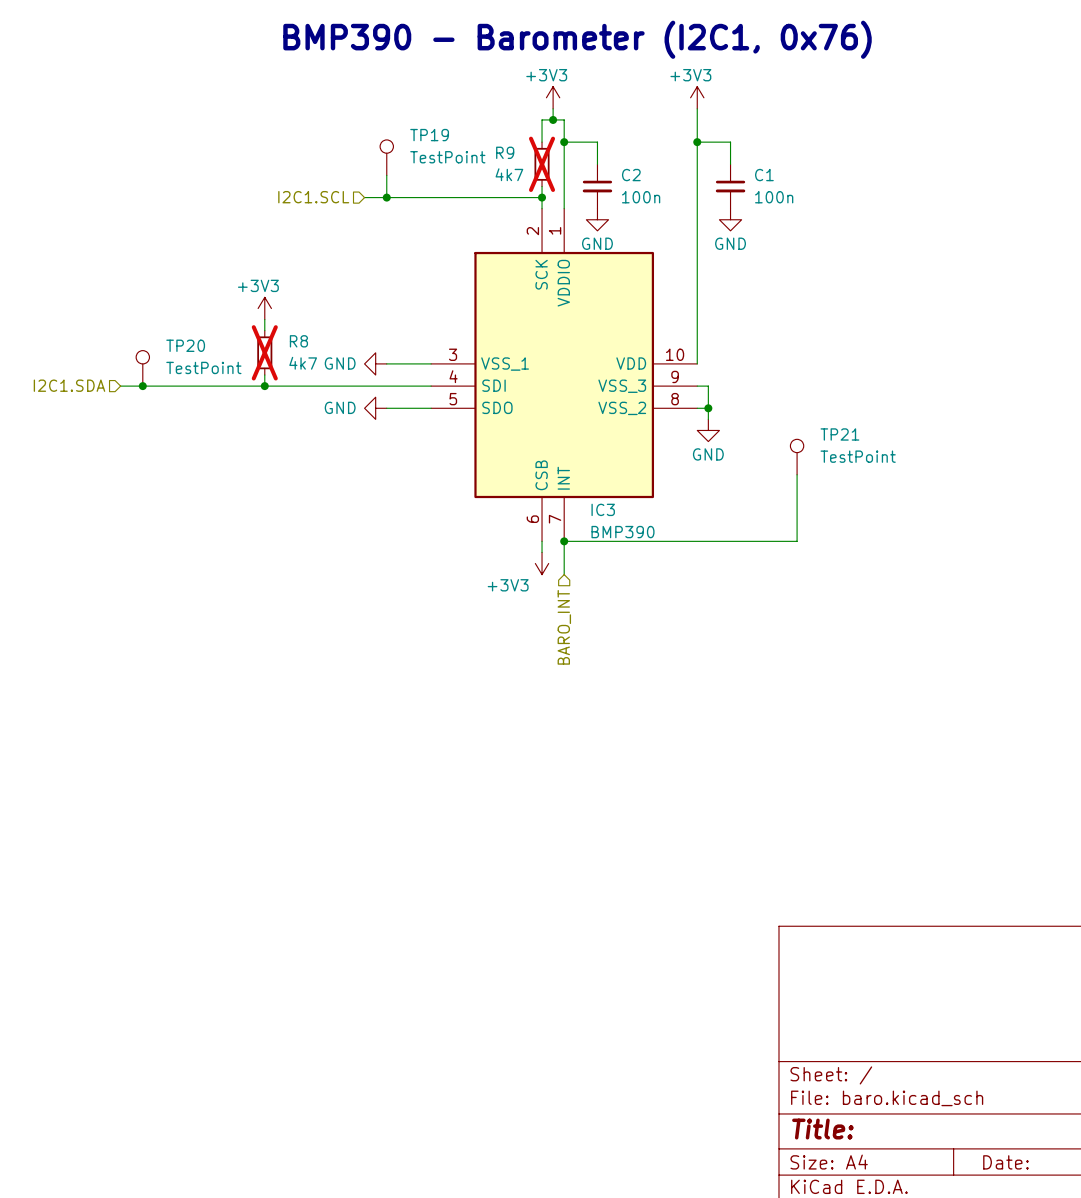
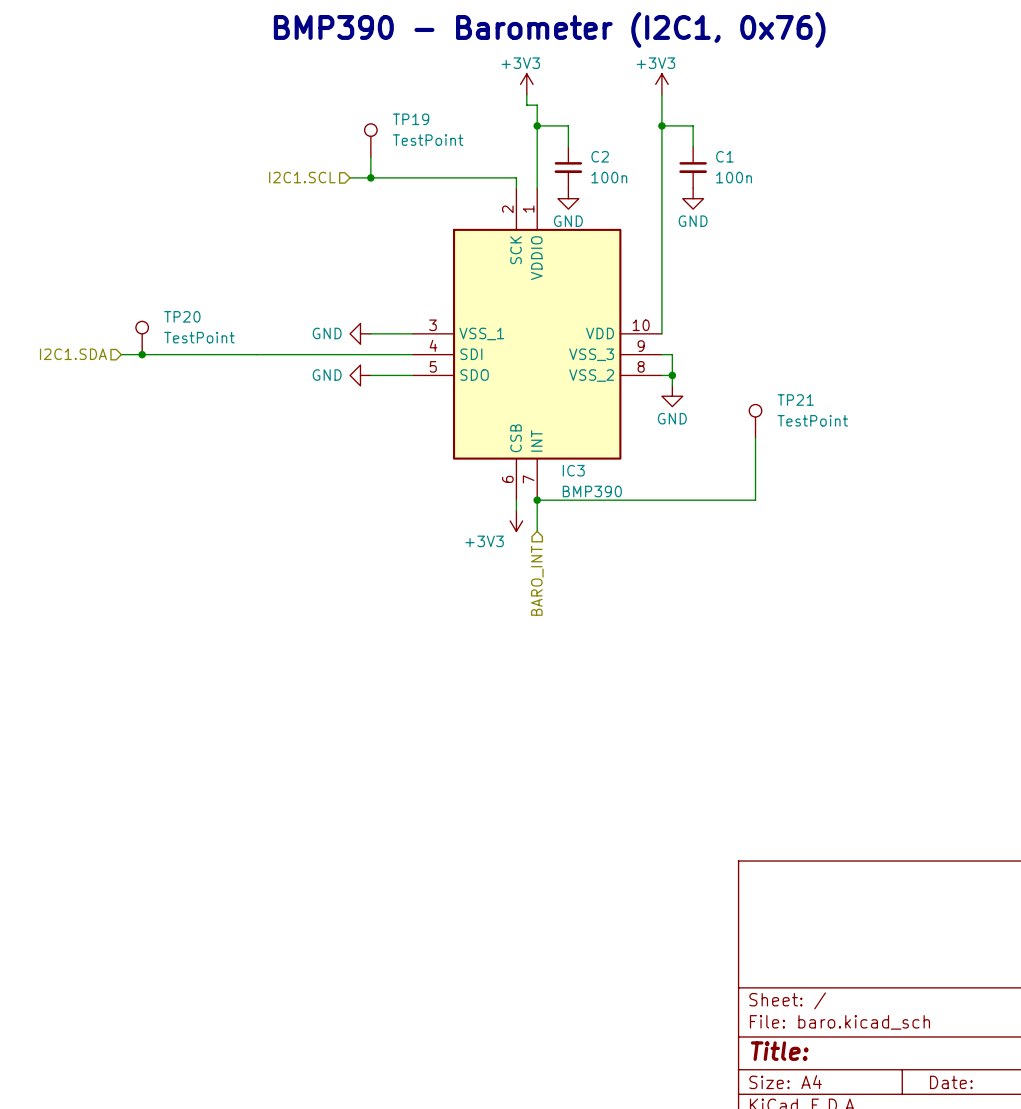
wire: (553, 119) (542, 119) (542, 142) -> none
junction: (553, 119) -> none
R9: 4k7 (542, 164) -> none
wire: (542, 186) (542, 197) -> none
junction: (542, 197) -> none
power symbol: +3V3 (264, 308) -> none
wire: (264, 319) (264, 330) -> none
R8: 4k7 (264, 352) -> none
wire: (264, 375) (264, 386) -> none
junction: (264, 386) -> none

